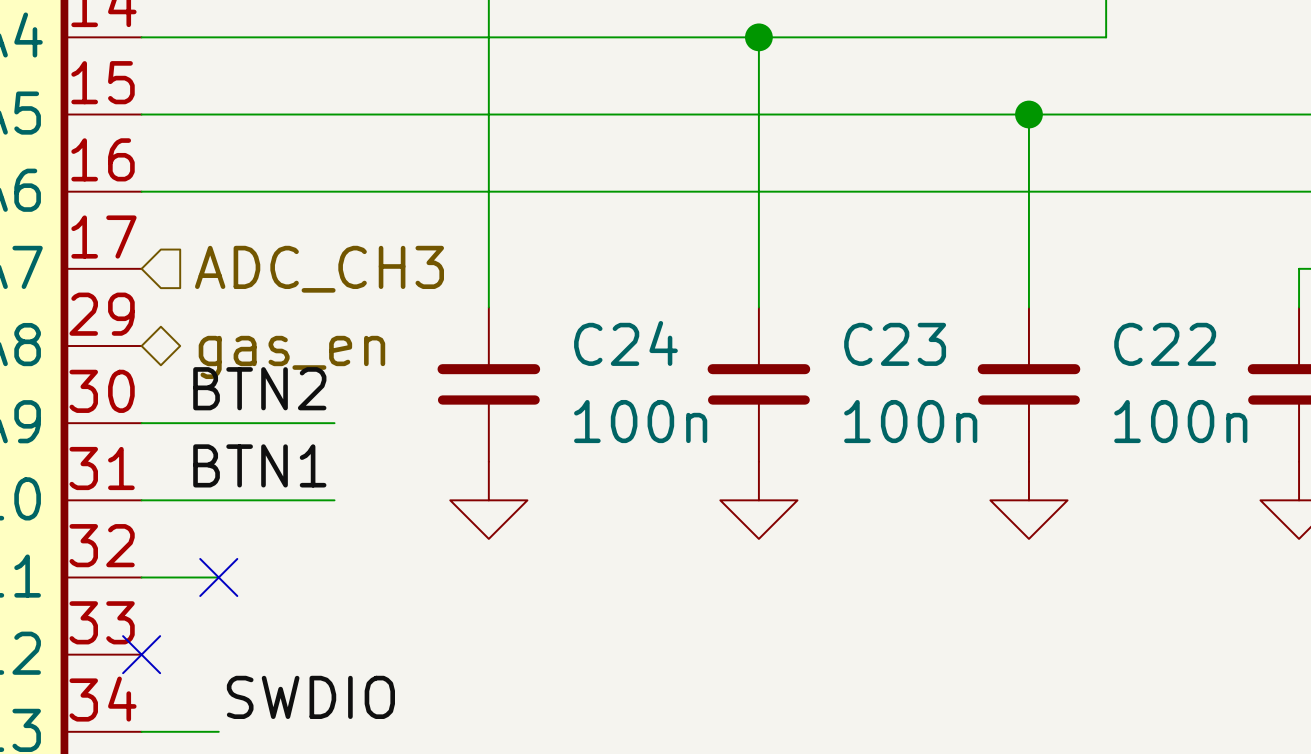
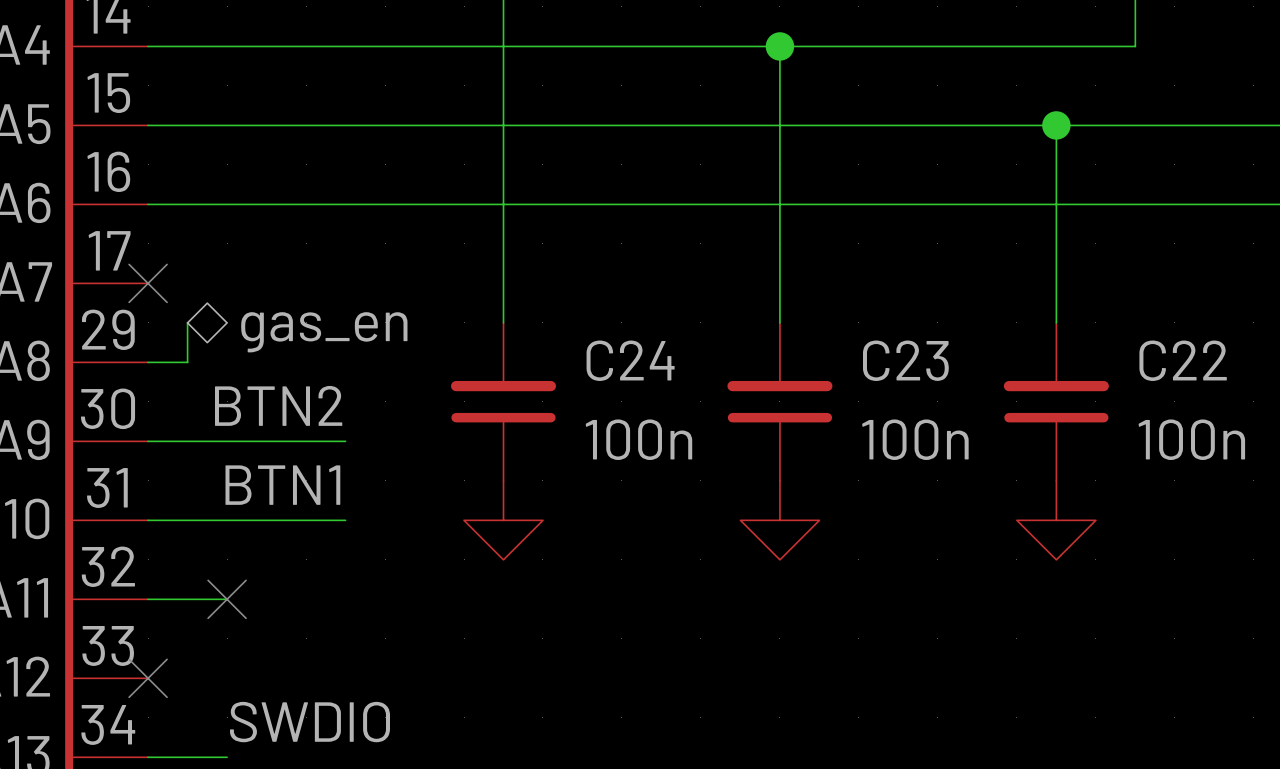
no-connect mark: none -> (148, 283)
hierarchical label: ADC_CH3 (319, 269) -> none
wire: none -> (187, 322) (187, 362) (148, 362)
hierarchical label position: gas_en (291, 357) -> gas_en (324, 332)

